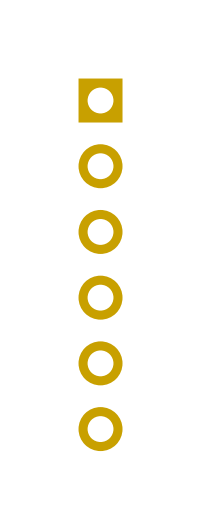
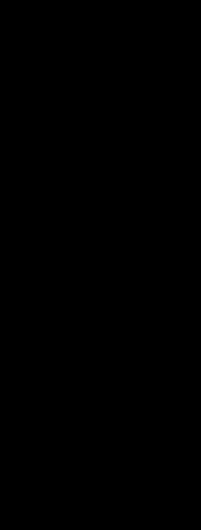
part: (100, 264) -> none

